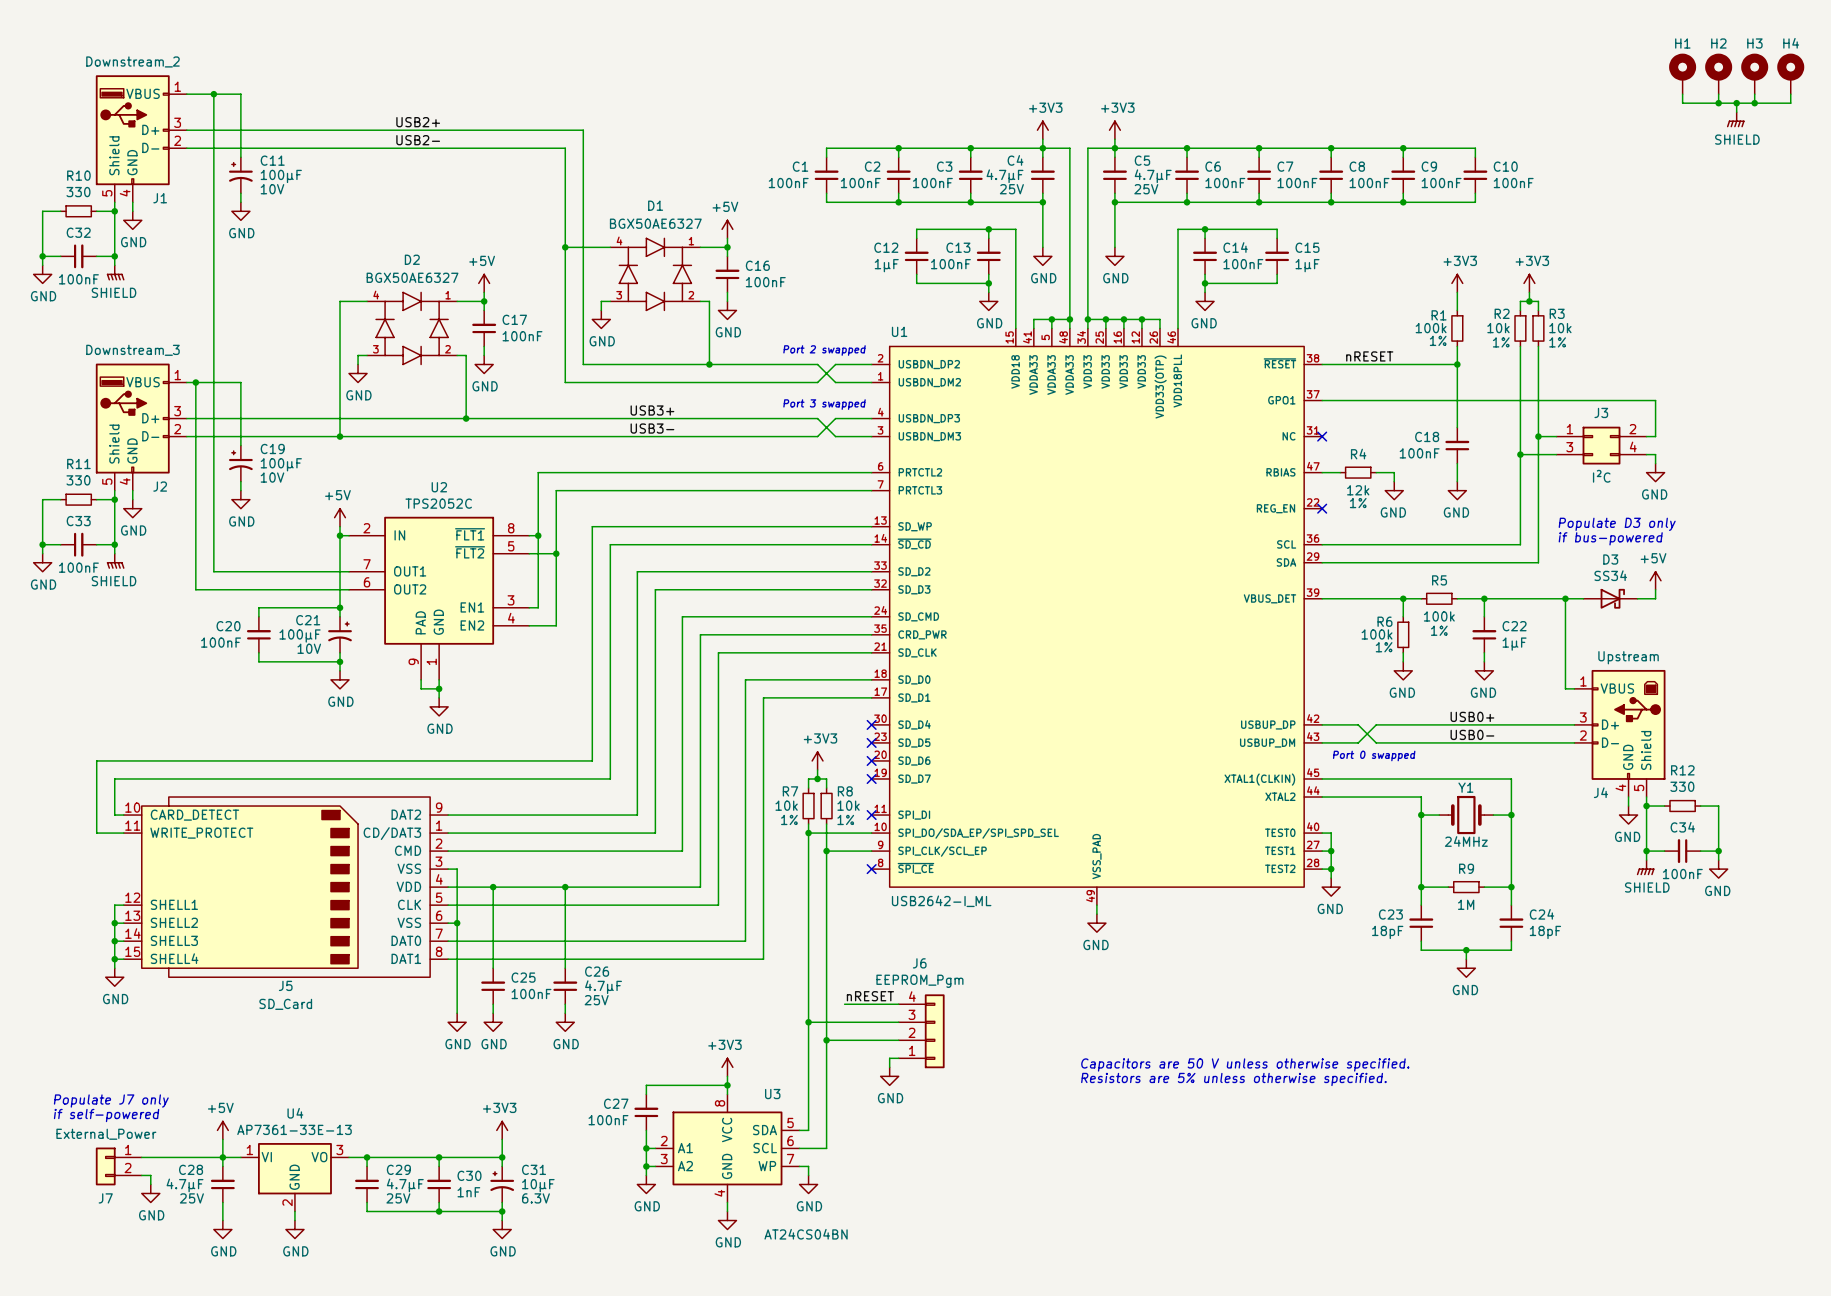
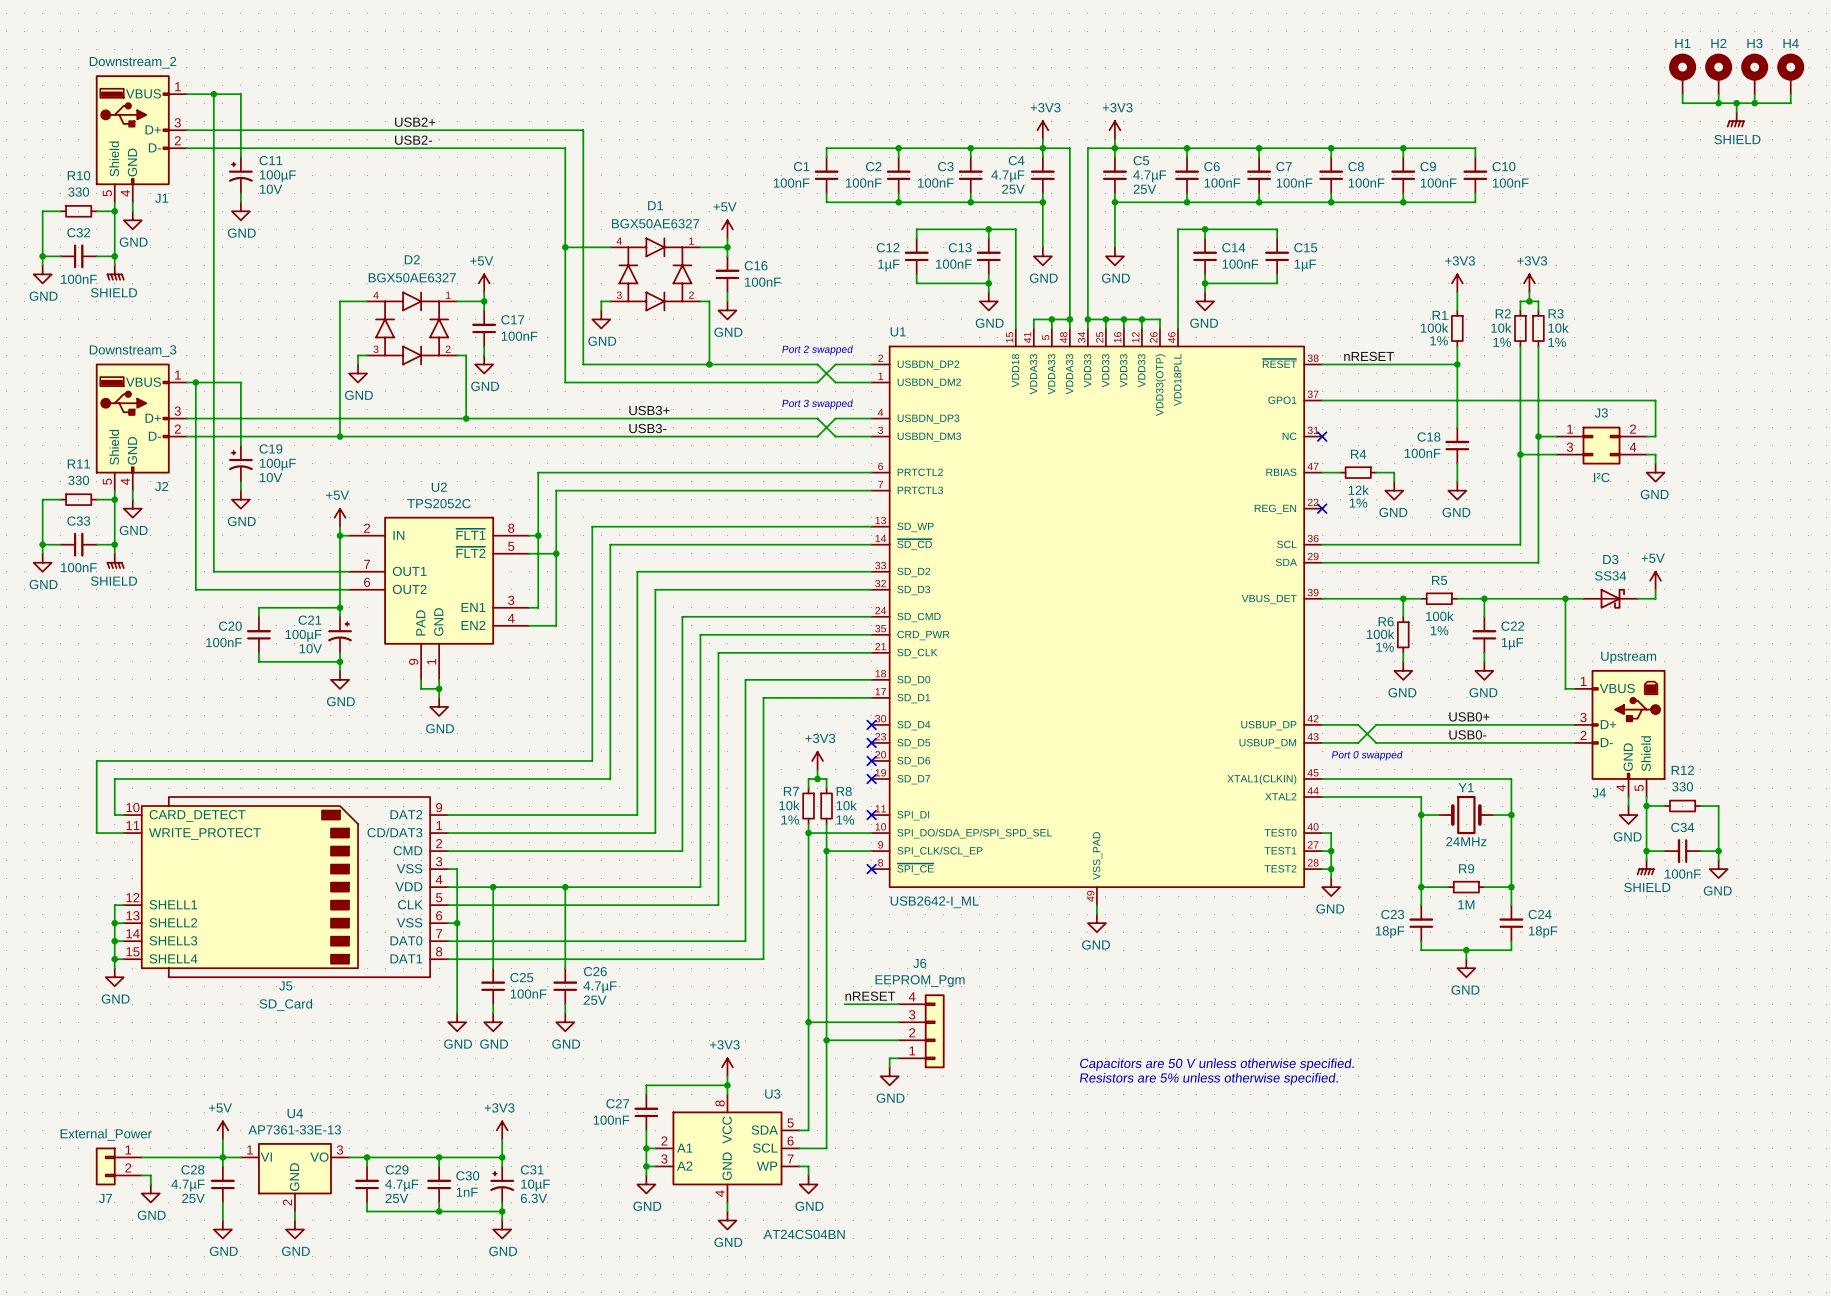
text: Populate D3 only (1617, 524) -> none
text: if bus-powered (1610, 538) -> none
text: Populate J7 only (111, 1101) -> none
text: if self-powered (106, 1115) -> none

